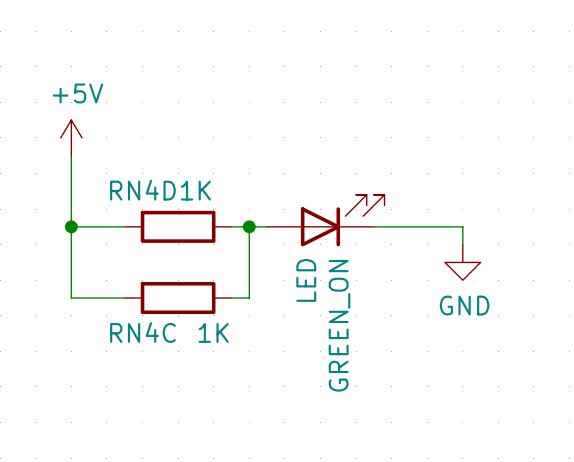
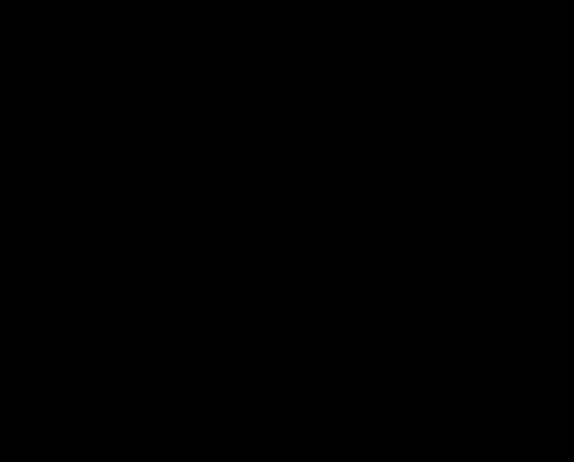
power symbol: +5V (71, 137) -> none
wire: (71, 155) (71, 298) (124, 298) -> none
GREEN_ON: LED (325, 220) -> none
wire: (71, 226) (124, 226) -> none
junction: (71, 226) -> none
RN4D: 1K (178, 226) -> none
wire: (231, 226) (267, 226) -> none
wire: (249, 226) (249, 298) (231, 298) -> none
junction: (249, 226) -> none
wire: (373, 226) (462, 226) (462, 244) -> none
power symbol: GND (462, 262) -> none
RN4C: 1K (178, 298) -> none

